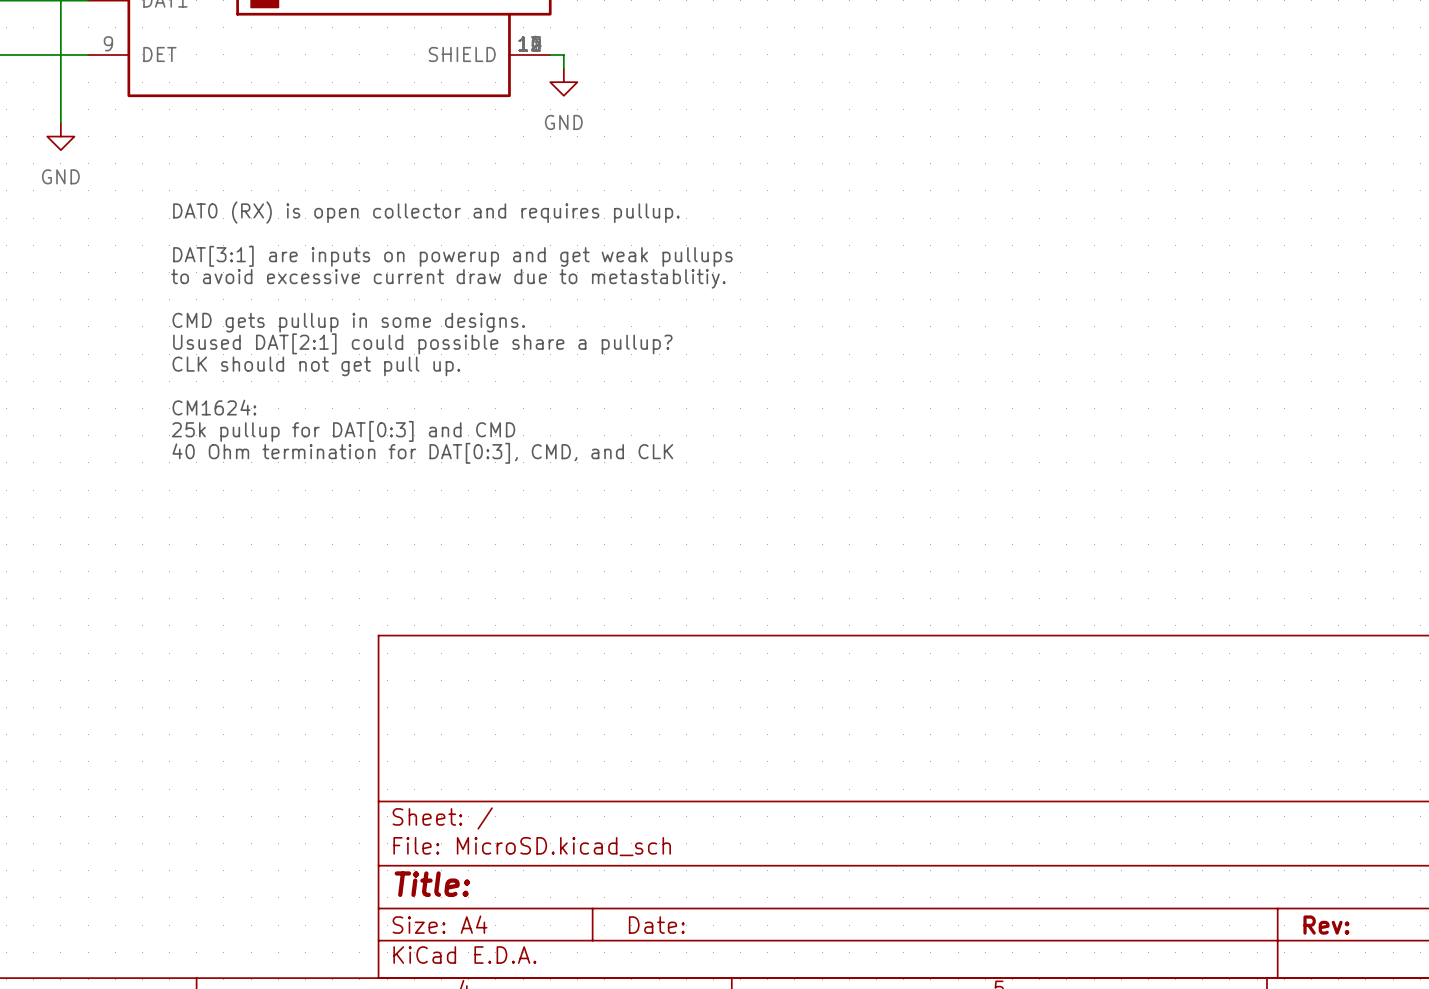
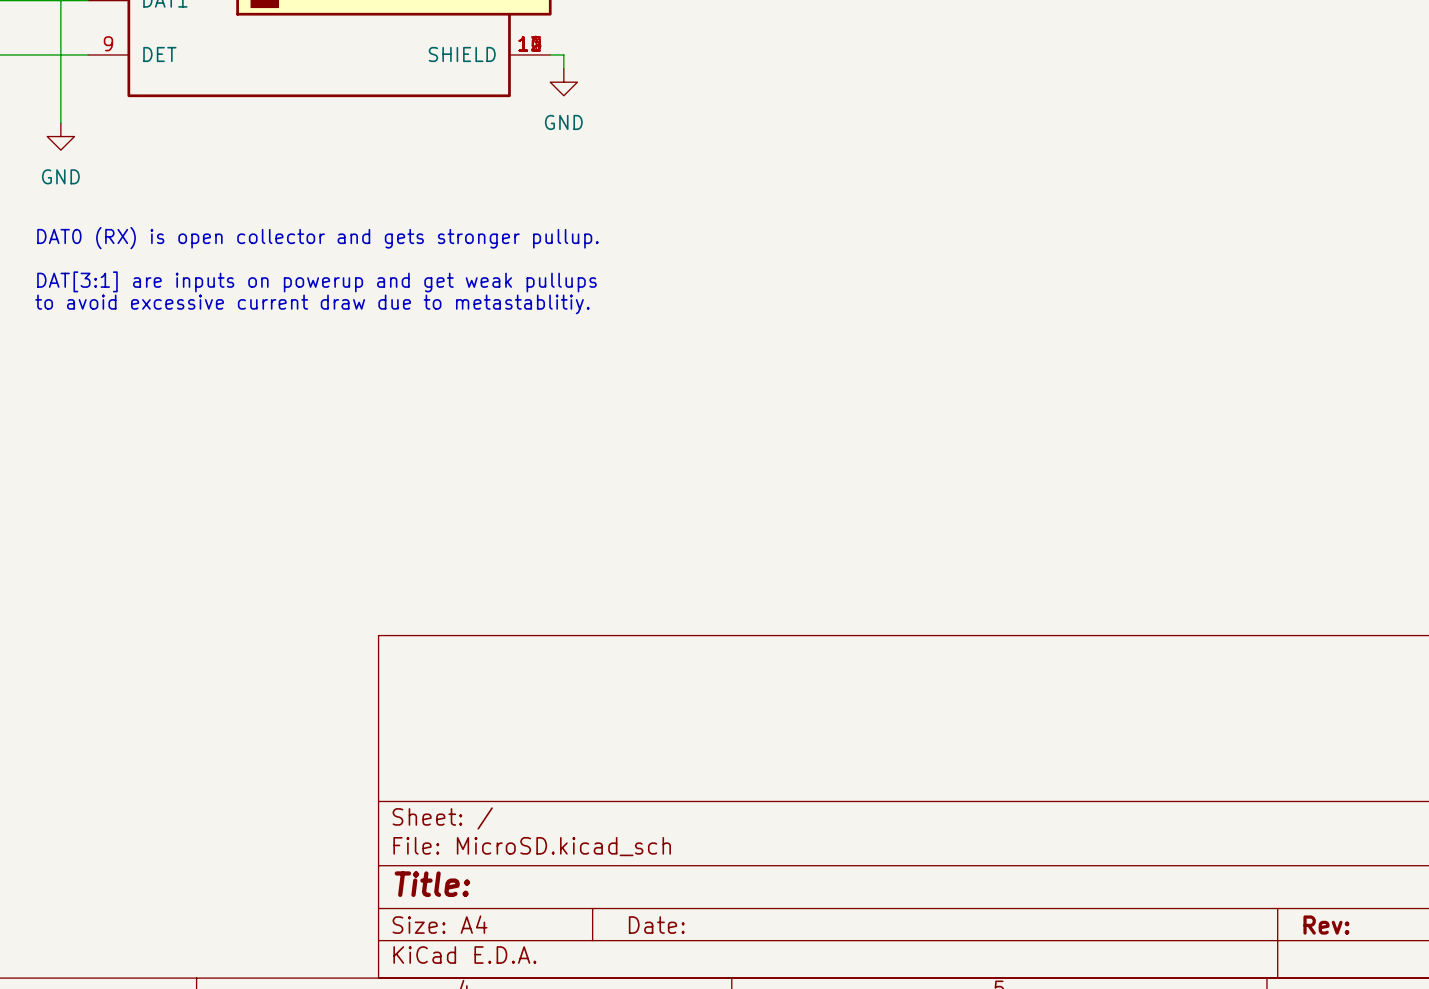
text: DAT0 (RX) is open collector and requires pullup. (426, 212) -> DAT0 (RX) is open collector and gets stronger pullup. (317, 238)
text position: DAT[3:1] are inputs on powerup and get weak pullups (452, 256) -> DAT[3:1] are inputs on powerup and get weak pullups (316, 281)
text position: to avoid excessive current draw due to metastablitiy. (448, 278) -> to avoid excessive current draw due to metastablitiy. (312, 304)
text: CMD gets pullup in some designs. (348, 322) -> none
text: Usused DAT[2:1] could possible share a pullup? (422, 343) -> none
text: CLK should not get pull up. (316, 366) -> none
text: CM1624: (214, 407) -> none
text: 25k pullup for DAT[0:3] and CMD (343, 431) -> none
text: 40 Ohm termination for DAT[0:3], CMD, and CLK (422, 453) -> none

